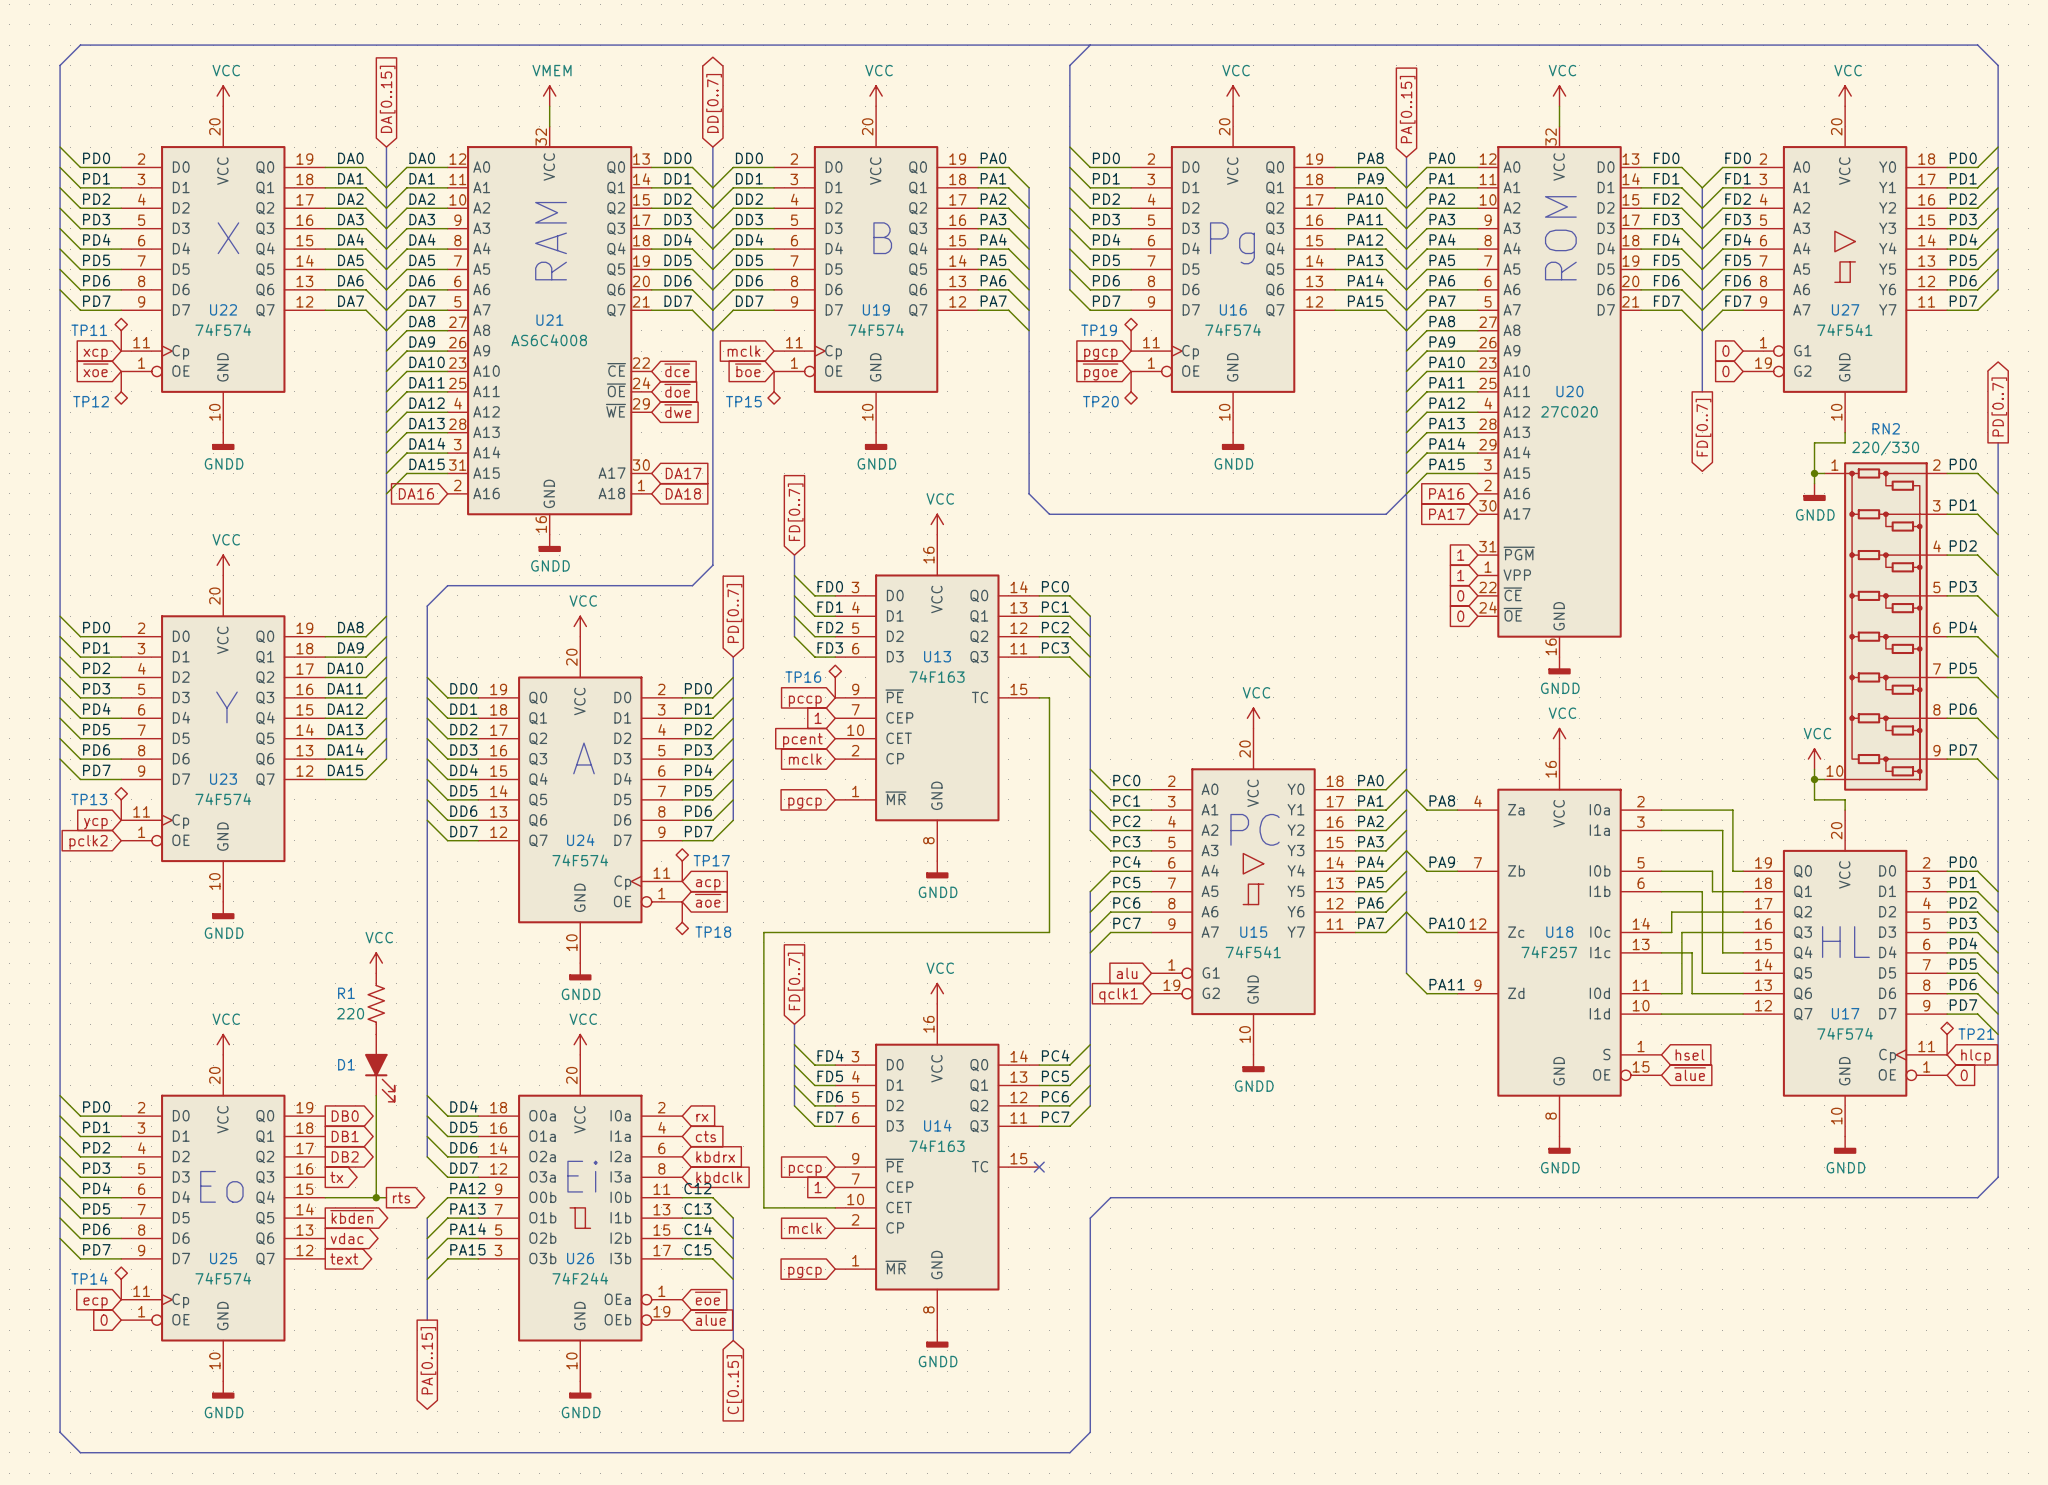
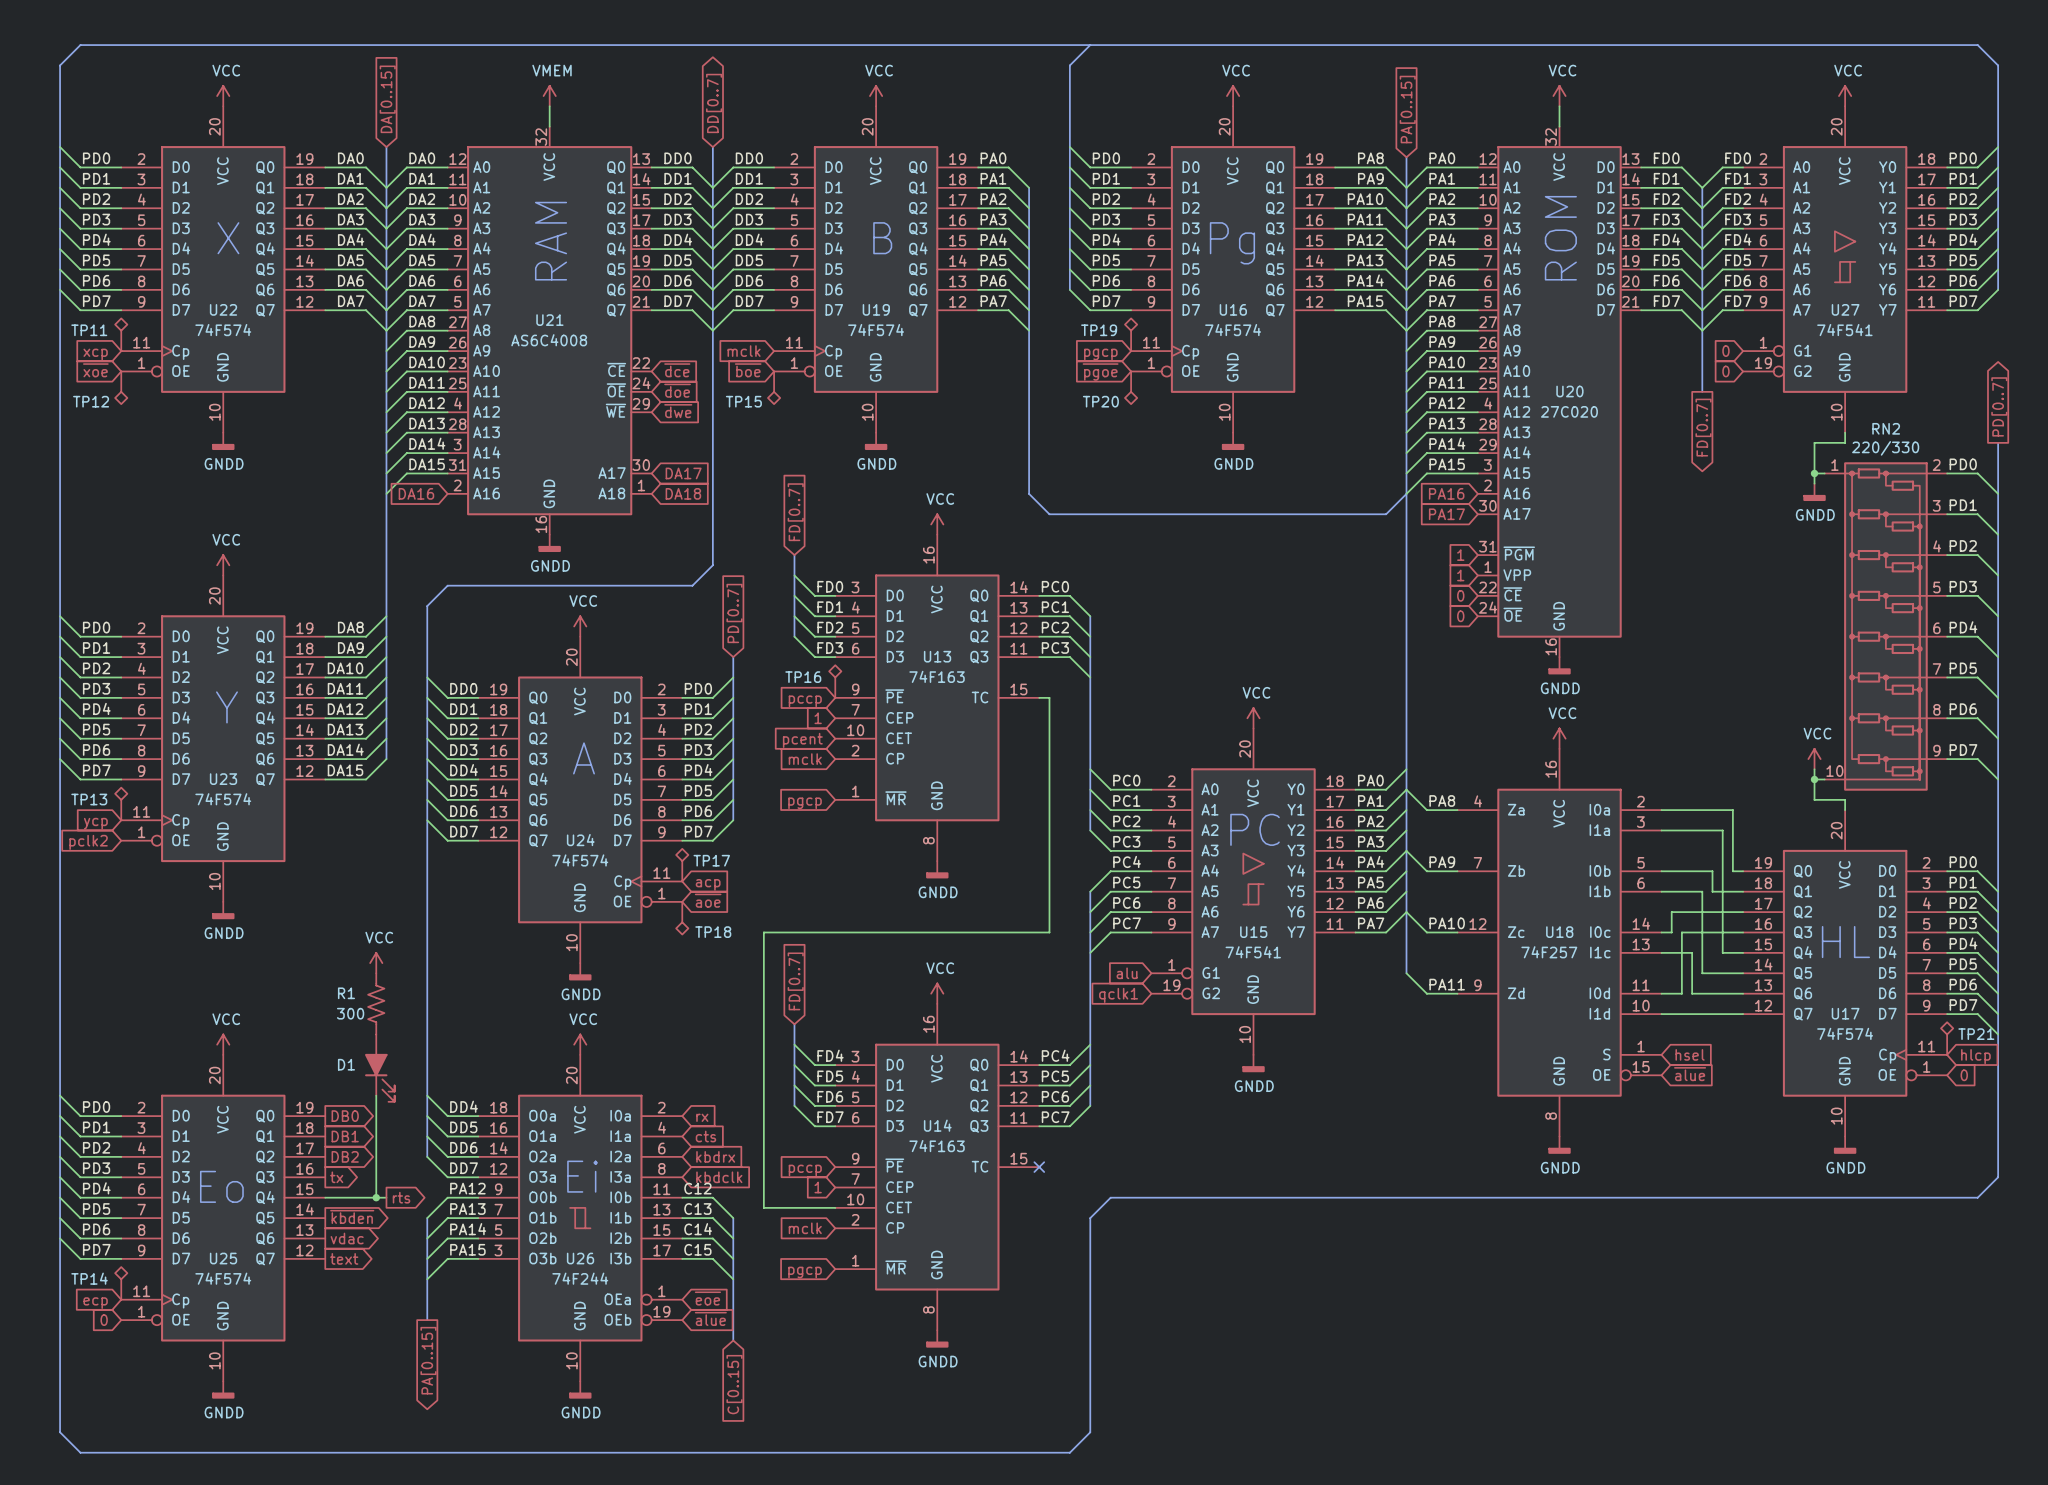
R1 value: 220 (350, 1013) -> 300 (350, 1013)

